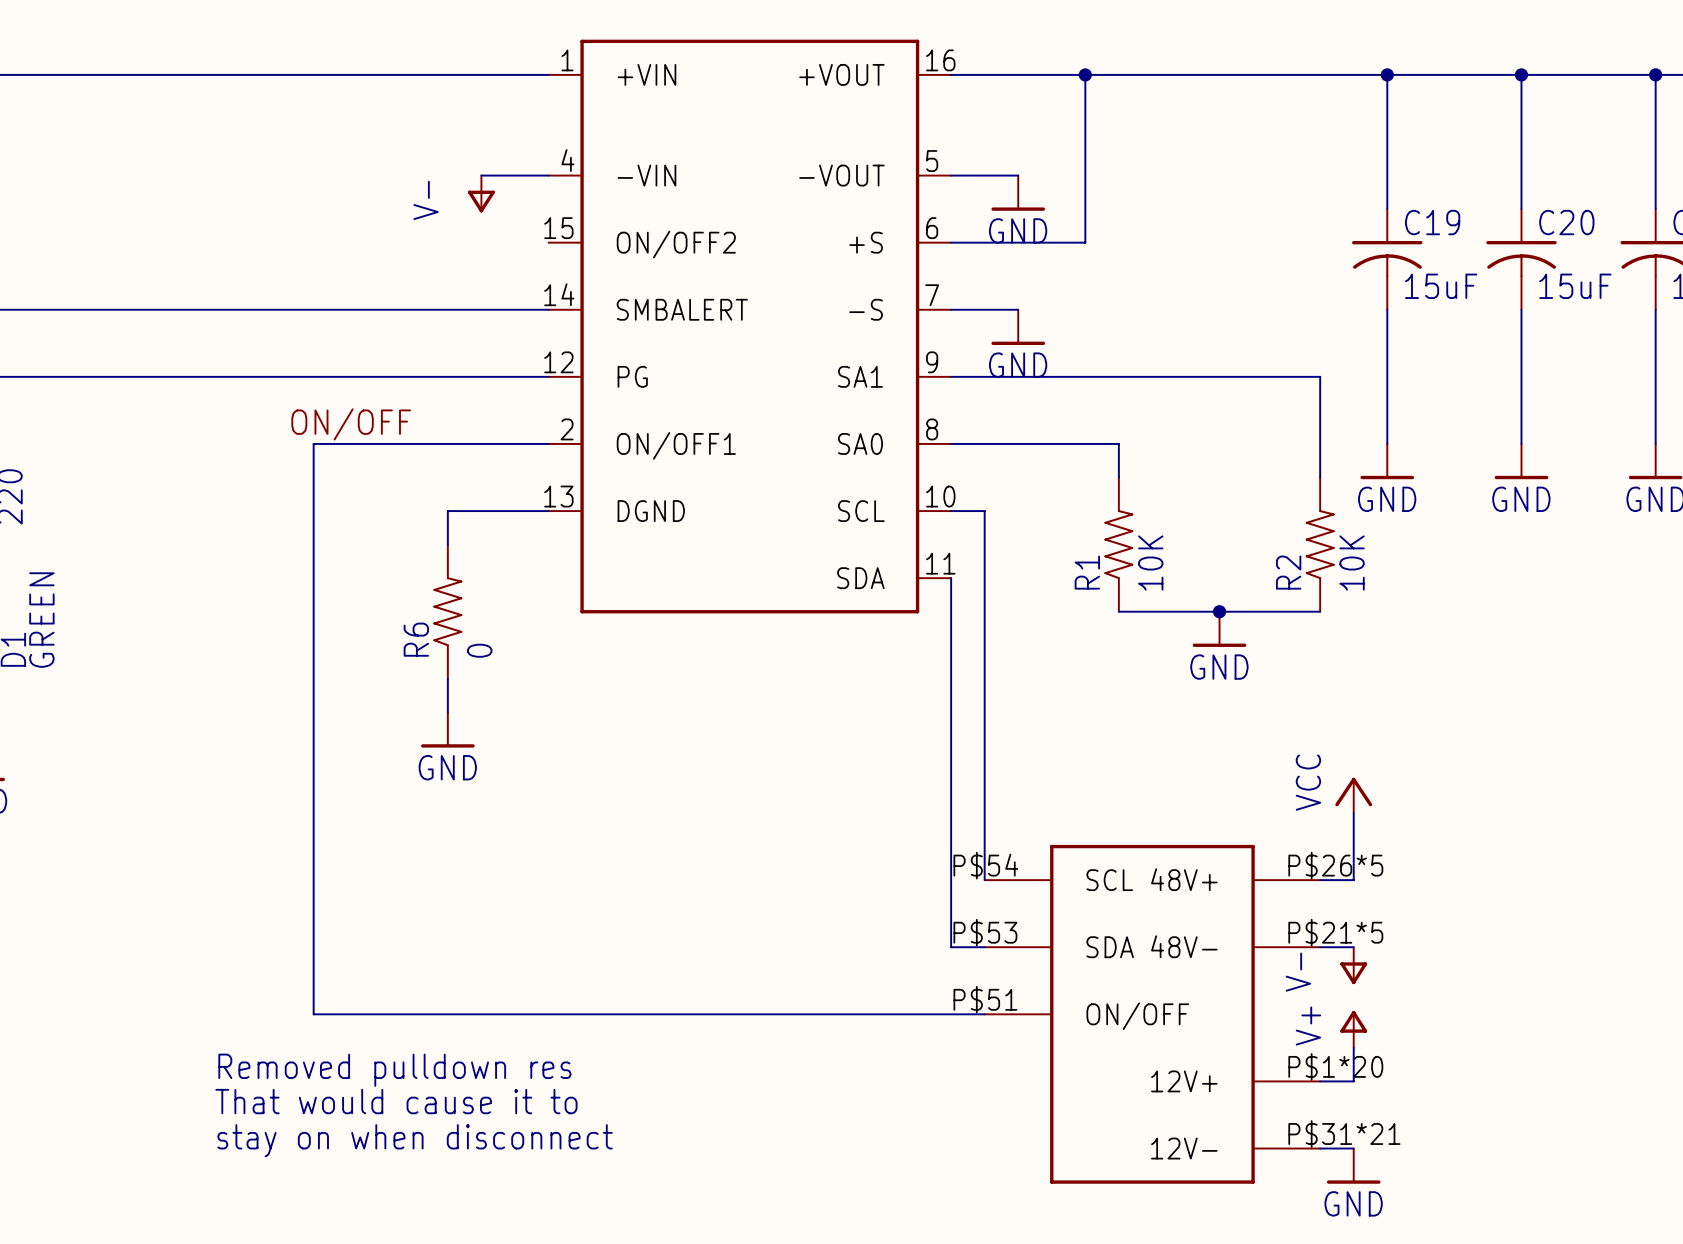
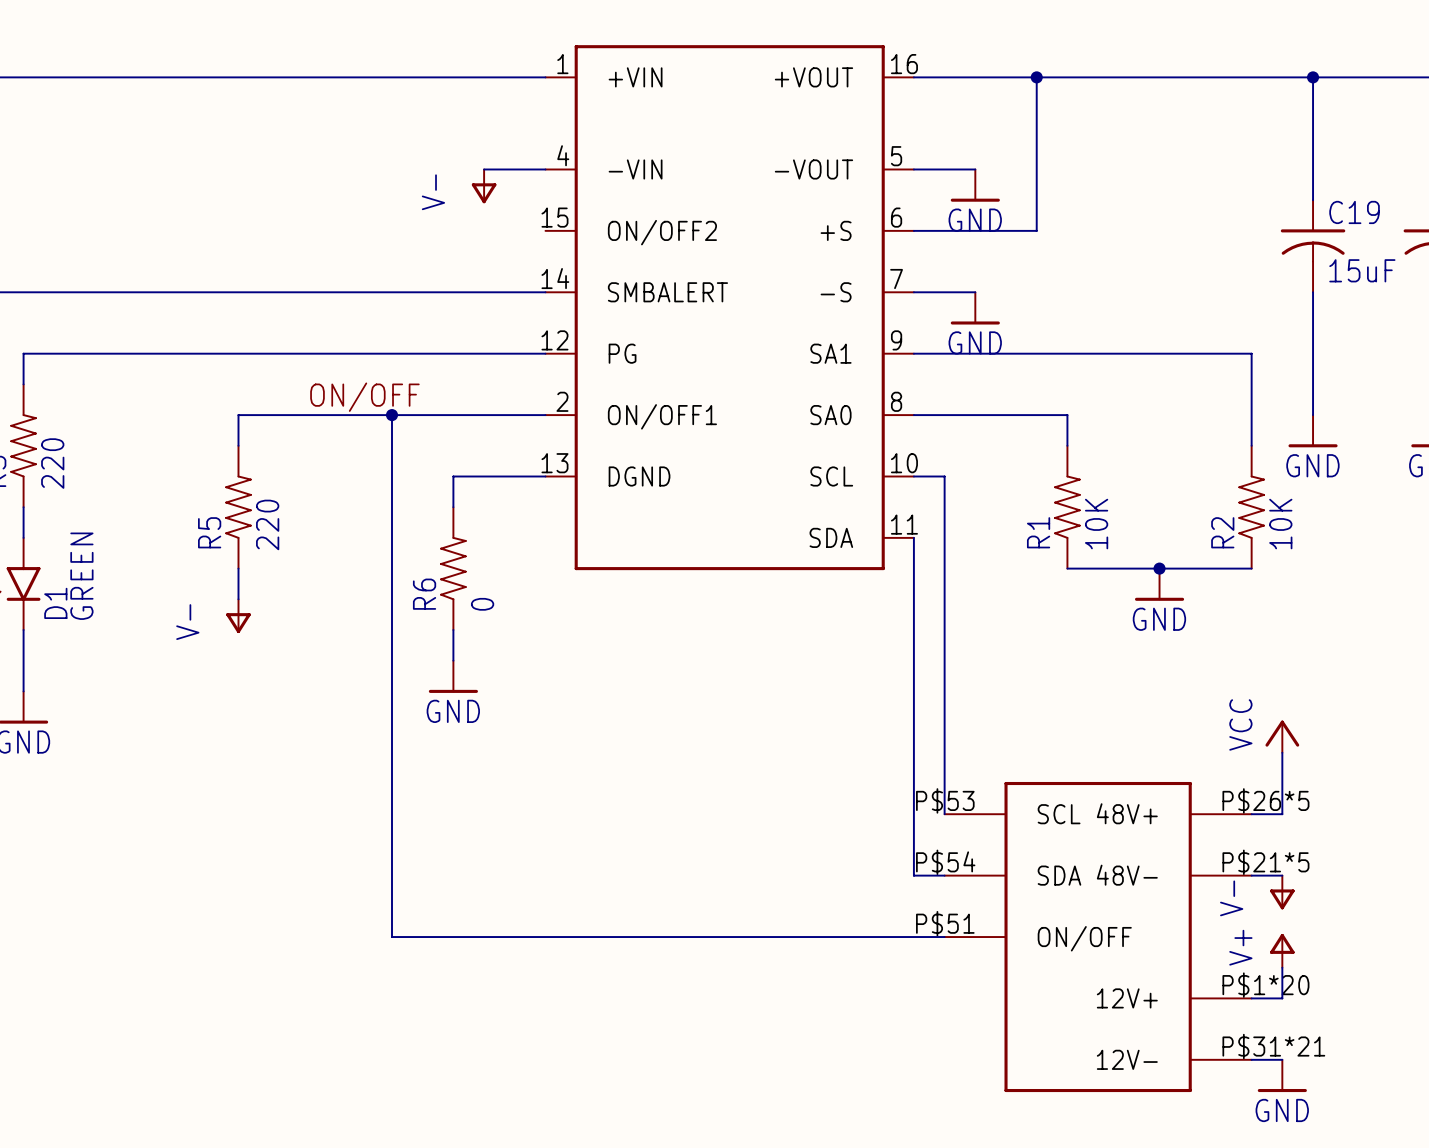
wire: (313, 443) (313, 1014) (380, 1014) -> (392, 415) (392, 937)
wire: none -> (330, 415) (238, 415) (238, 445)
junction: none -> (392, 415)
R5: none -> 220 (238, 507)
wire: none -> (238, 568) (238, 599)
power symbol: none -> V- (238, 616)
part pin number: P$54 (985, 865) -> P$53 (945, 800)
part pin number: P$53 (985, 932) -> P$54 (945, 862)
text: Removed pulldown res (394, 1070) -> none
text: That would cause it to (396, 1101) -> none
text: stay on when disconnect (415, 1140) -> none

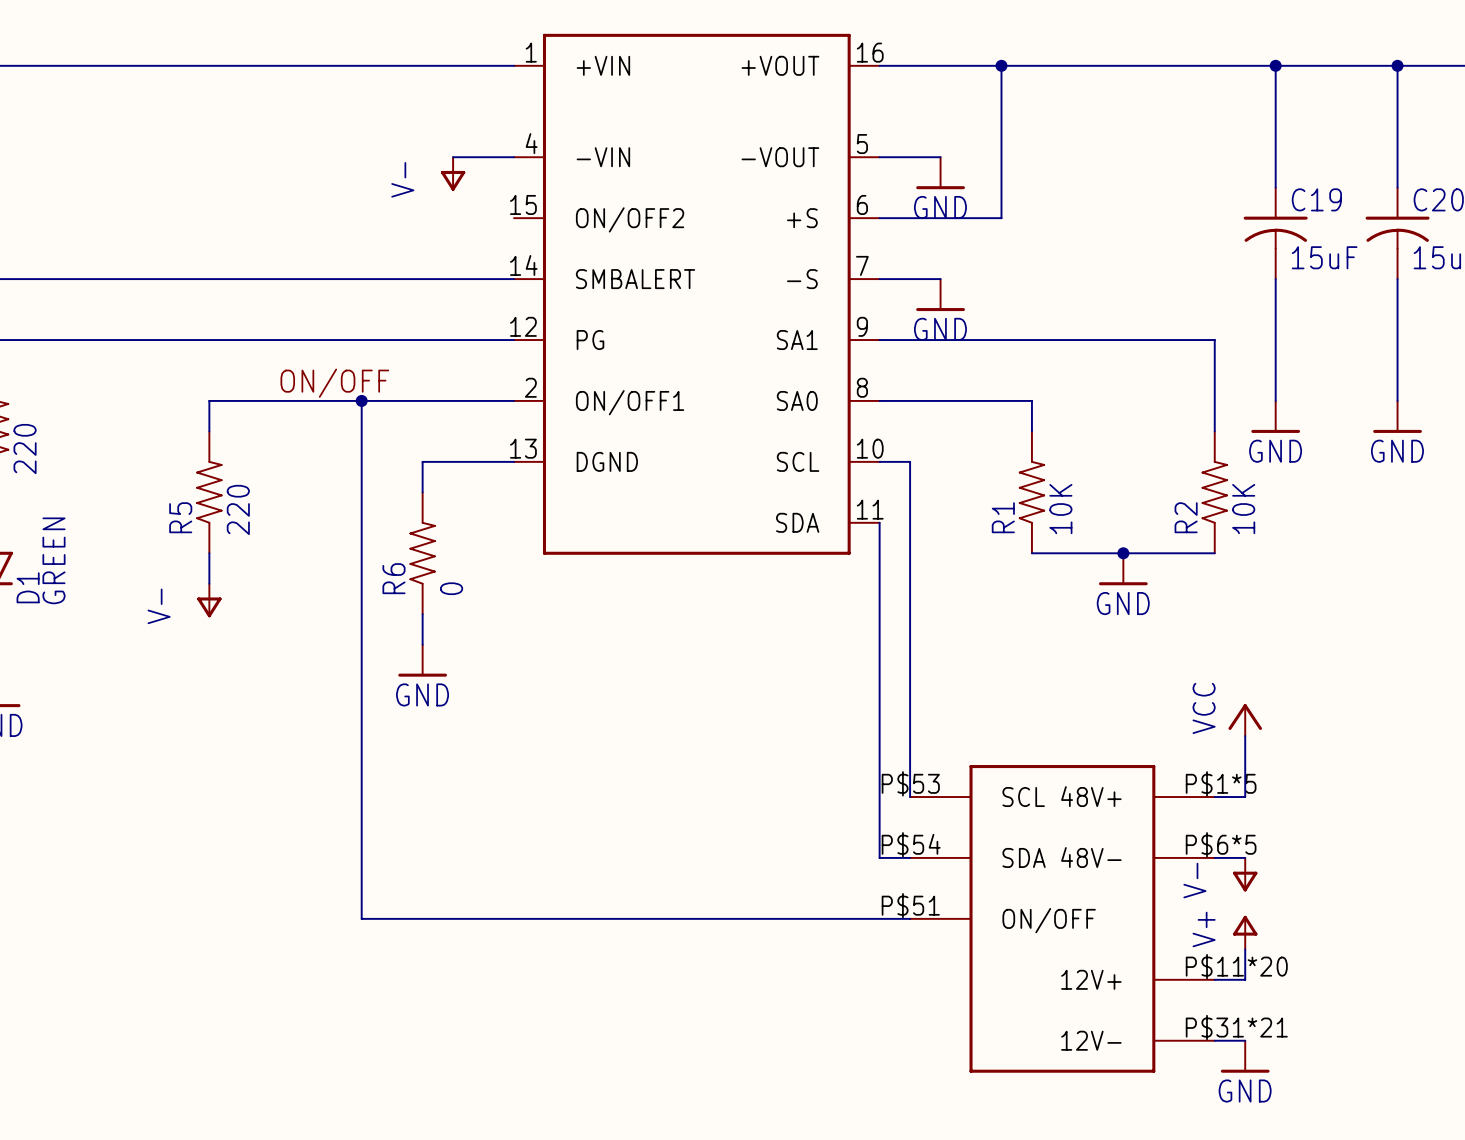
part pin number: P$26*5 (1265, 800) -> P$1*5 (1221, 783)
part pin number: P$21*5 (1265, 862) -> P$6*5 (1221, 844)
part pin number: P$1*20 (1265, 985) -> P$11*20 (1236, 966)

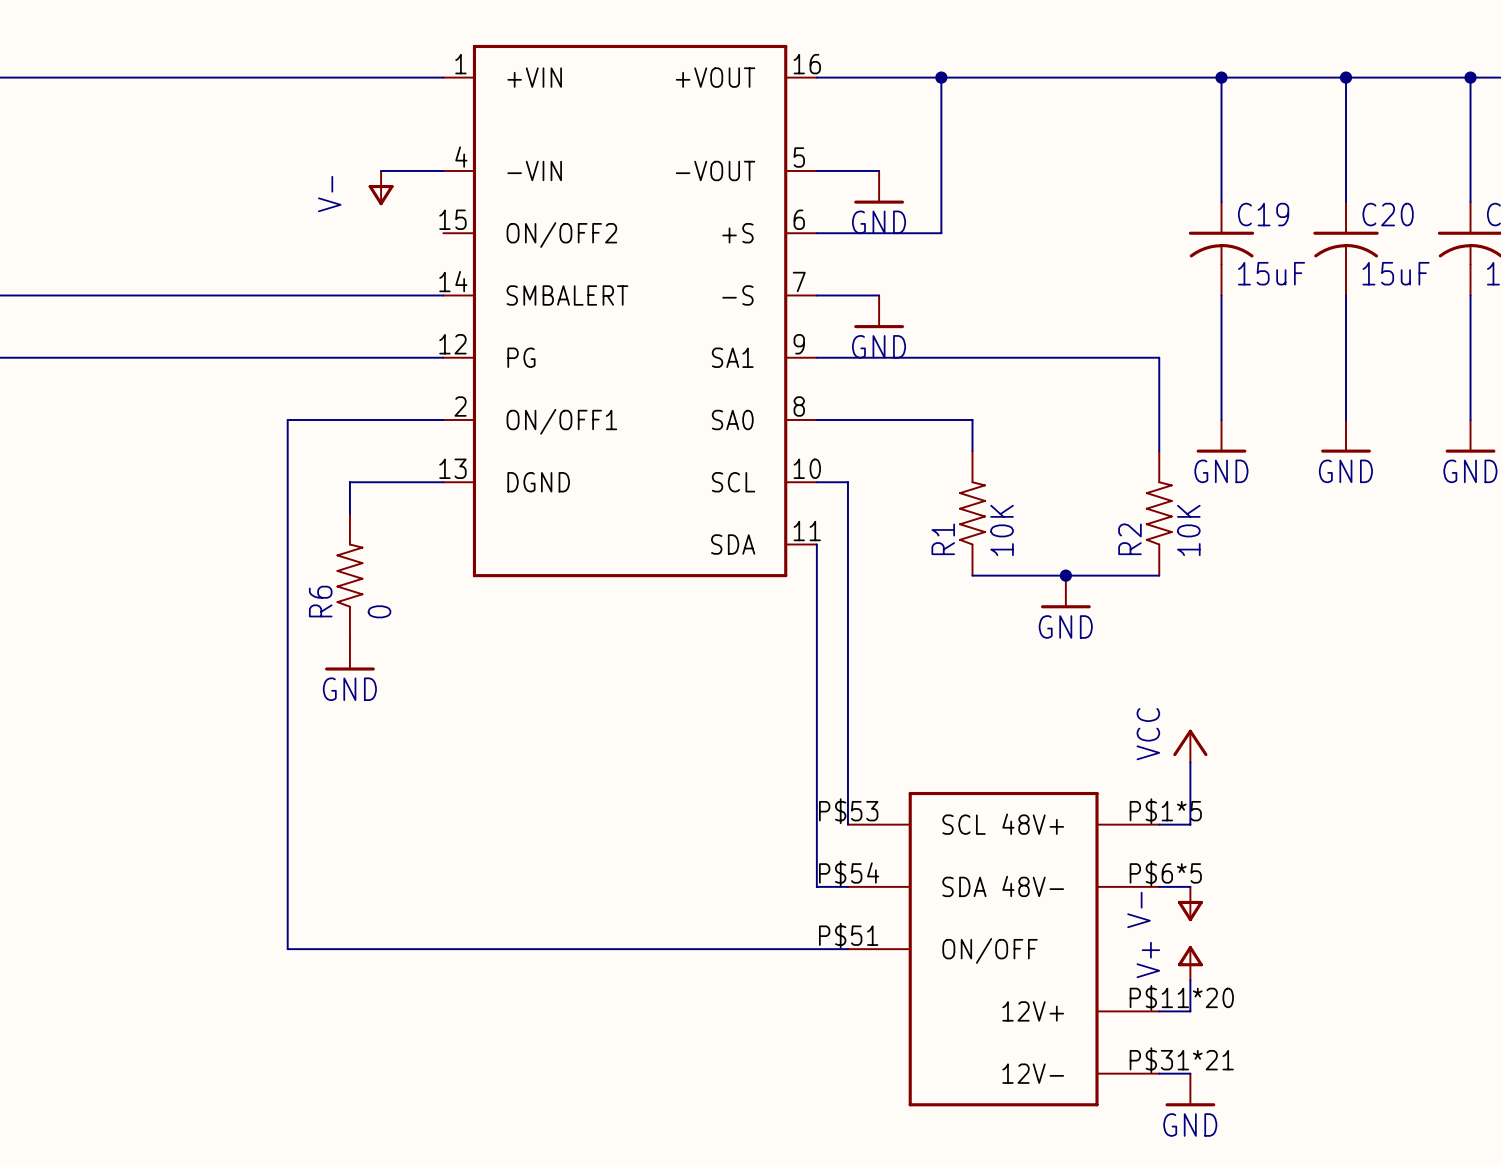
label: ON/OFF (334, 383) -> none
wire: (361, 400) (209, 400) (209, 431) -> none
junction: (361, 400) -> none
R5: 220 (209, 492) -> none
wire: (209, 553) (209, 583) -> none
power symbol: V- (209, 600) -> none
power symbol position: GND (422, 660) -> GND (349, 654)

